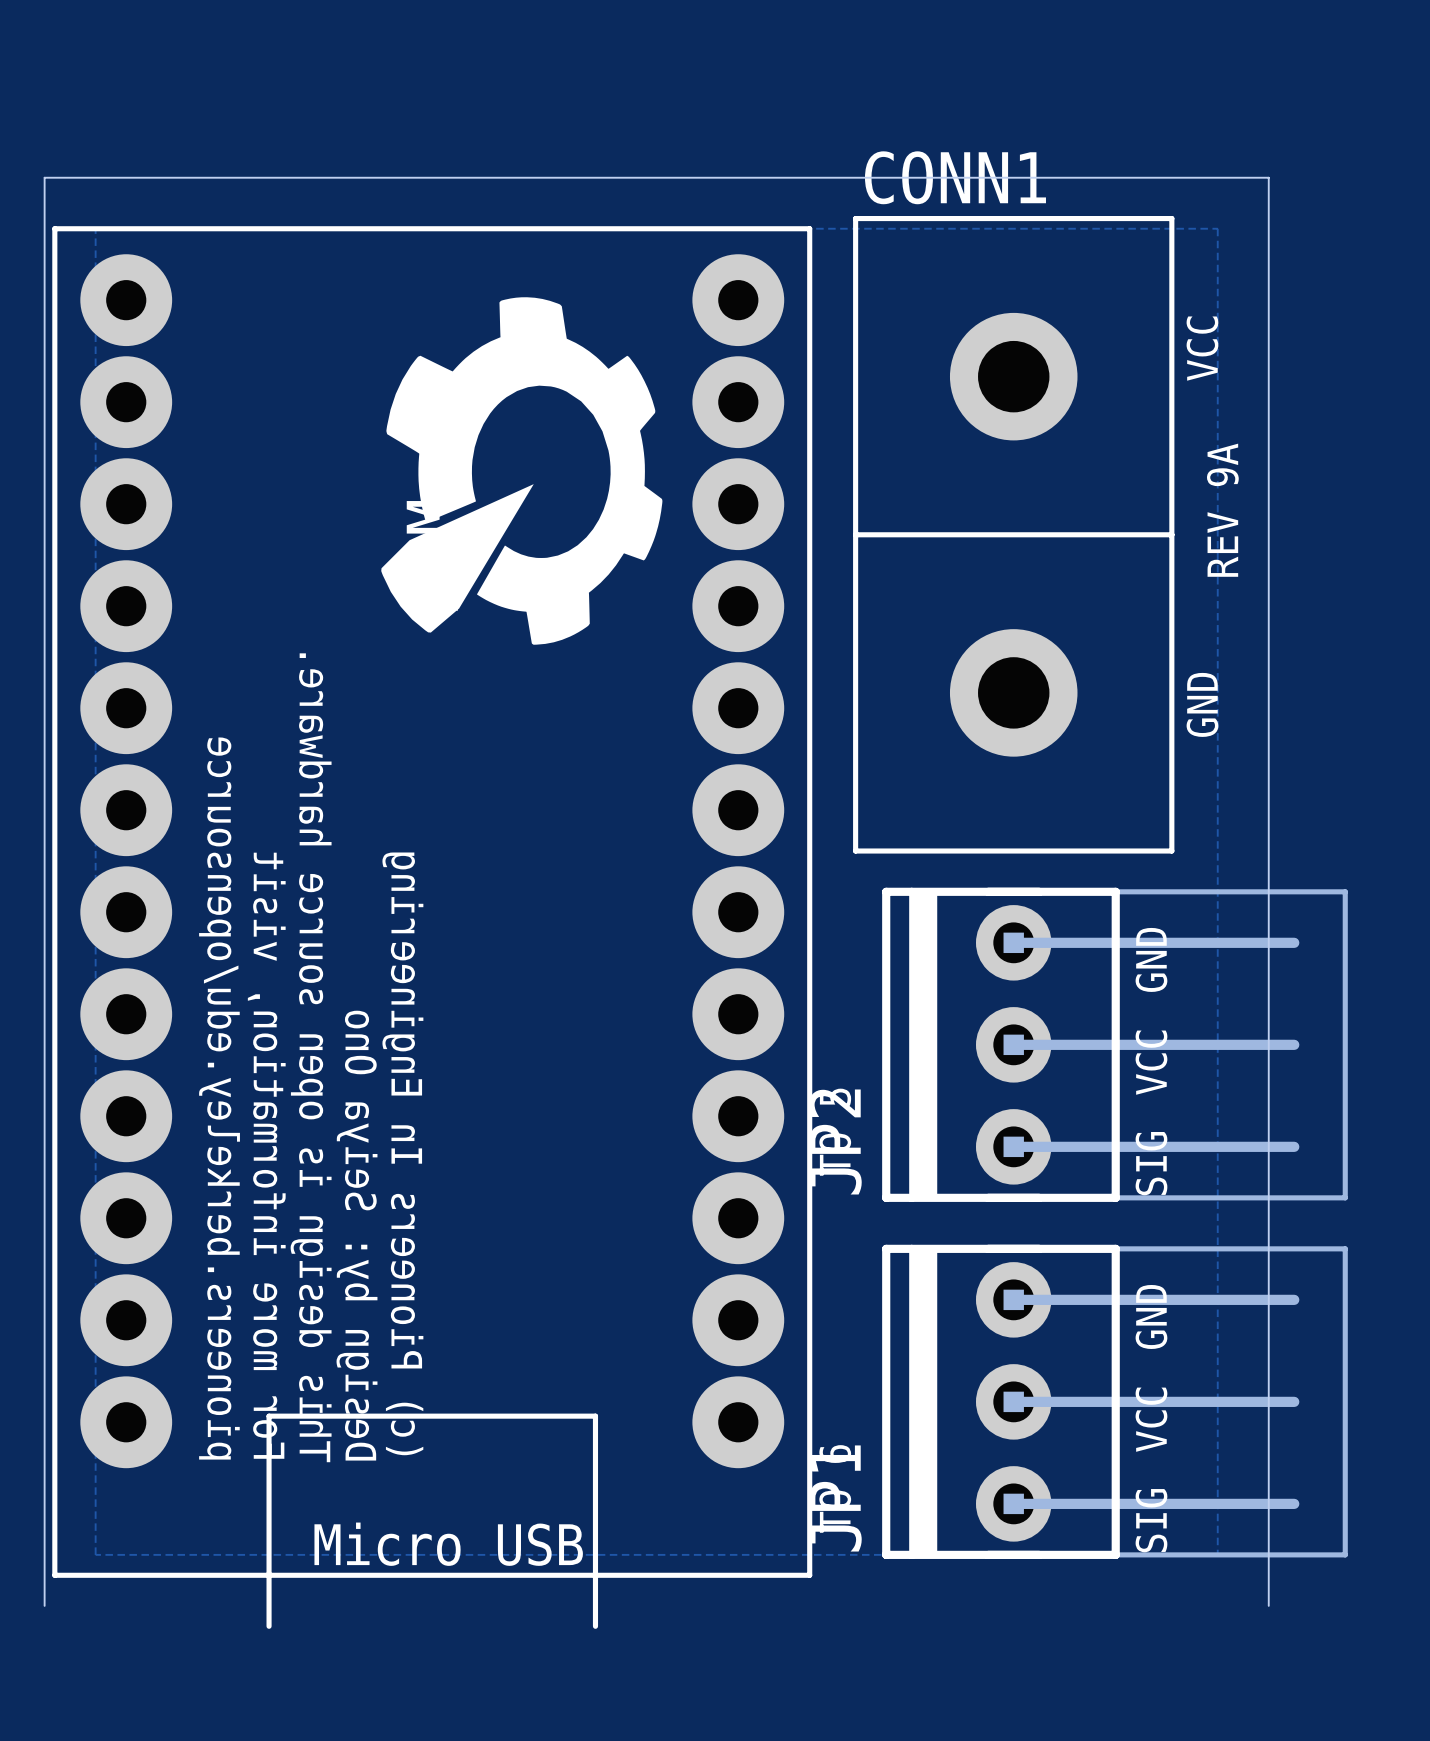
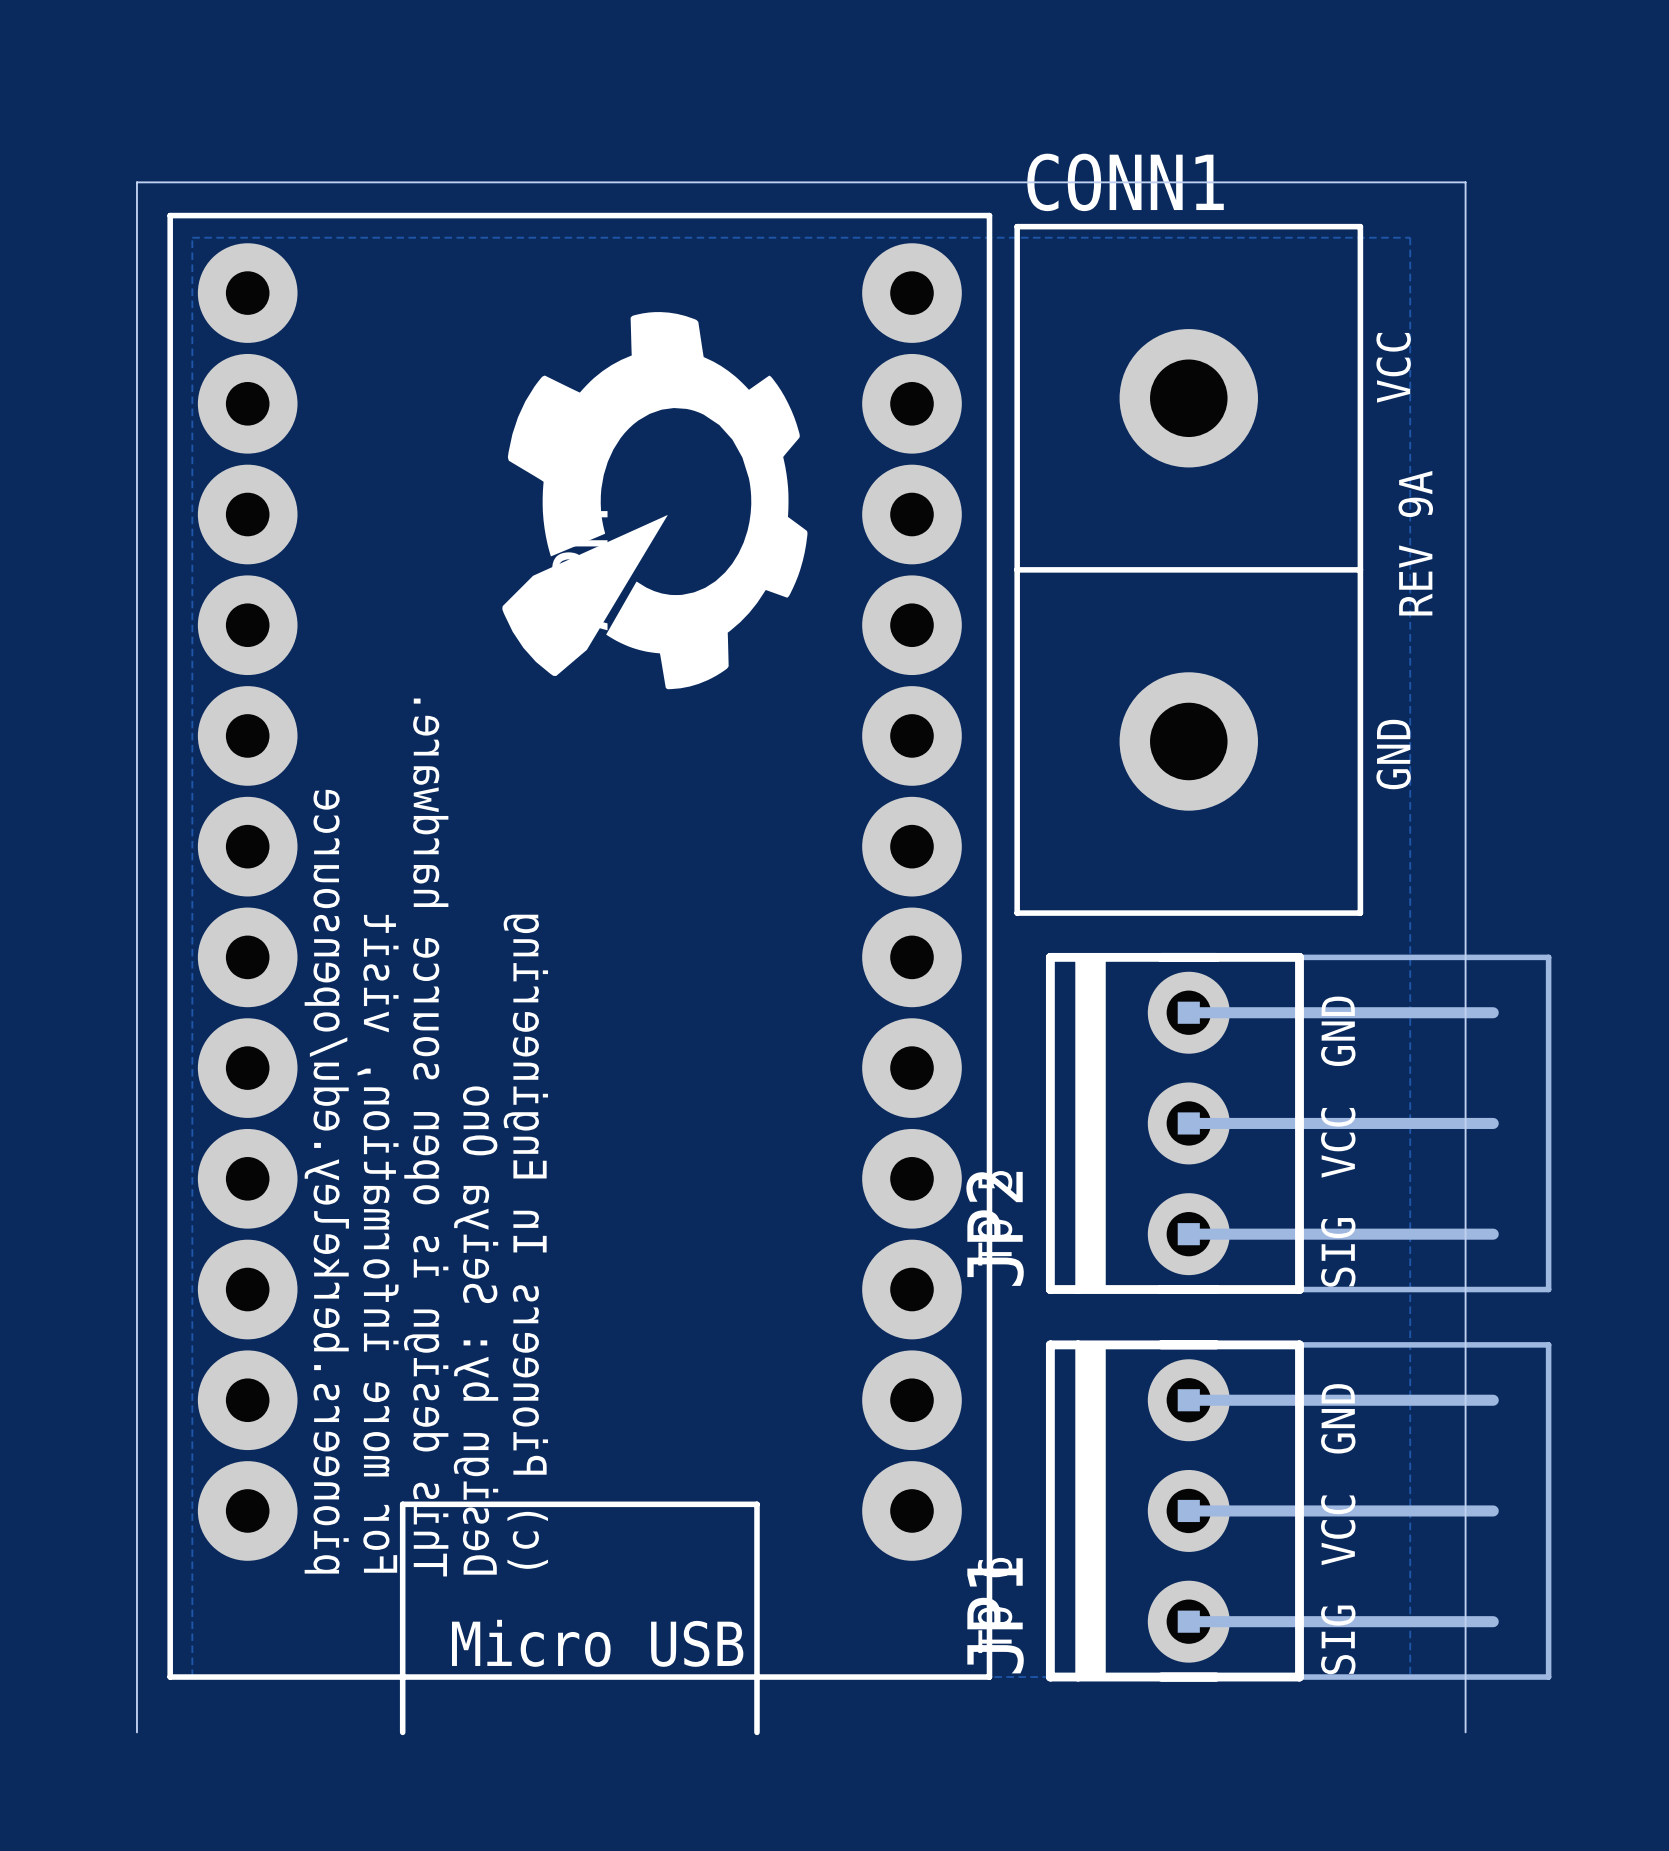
part position: (432, 927) -> (579, 973)

